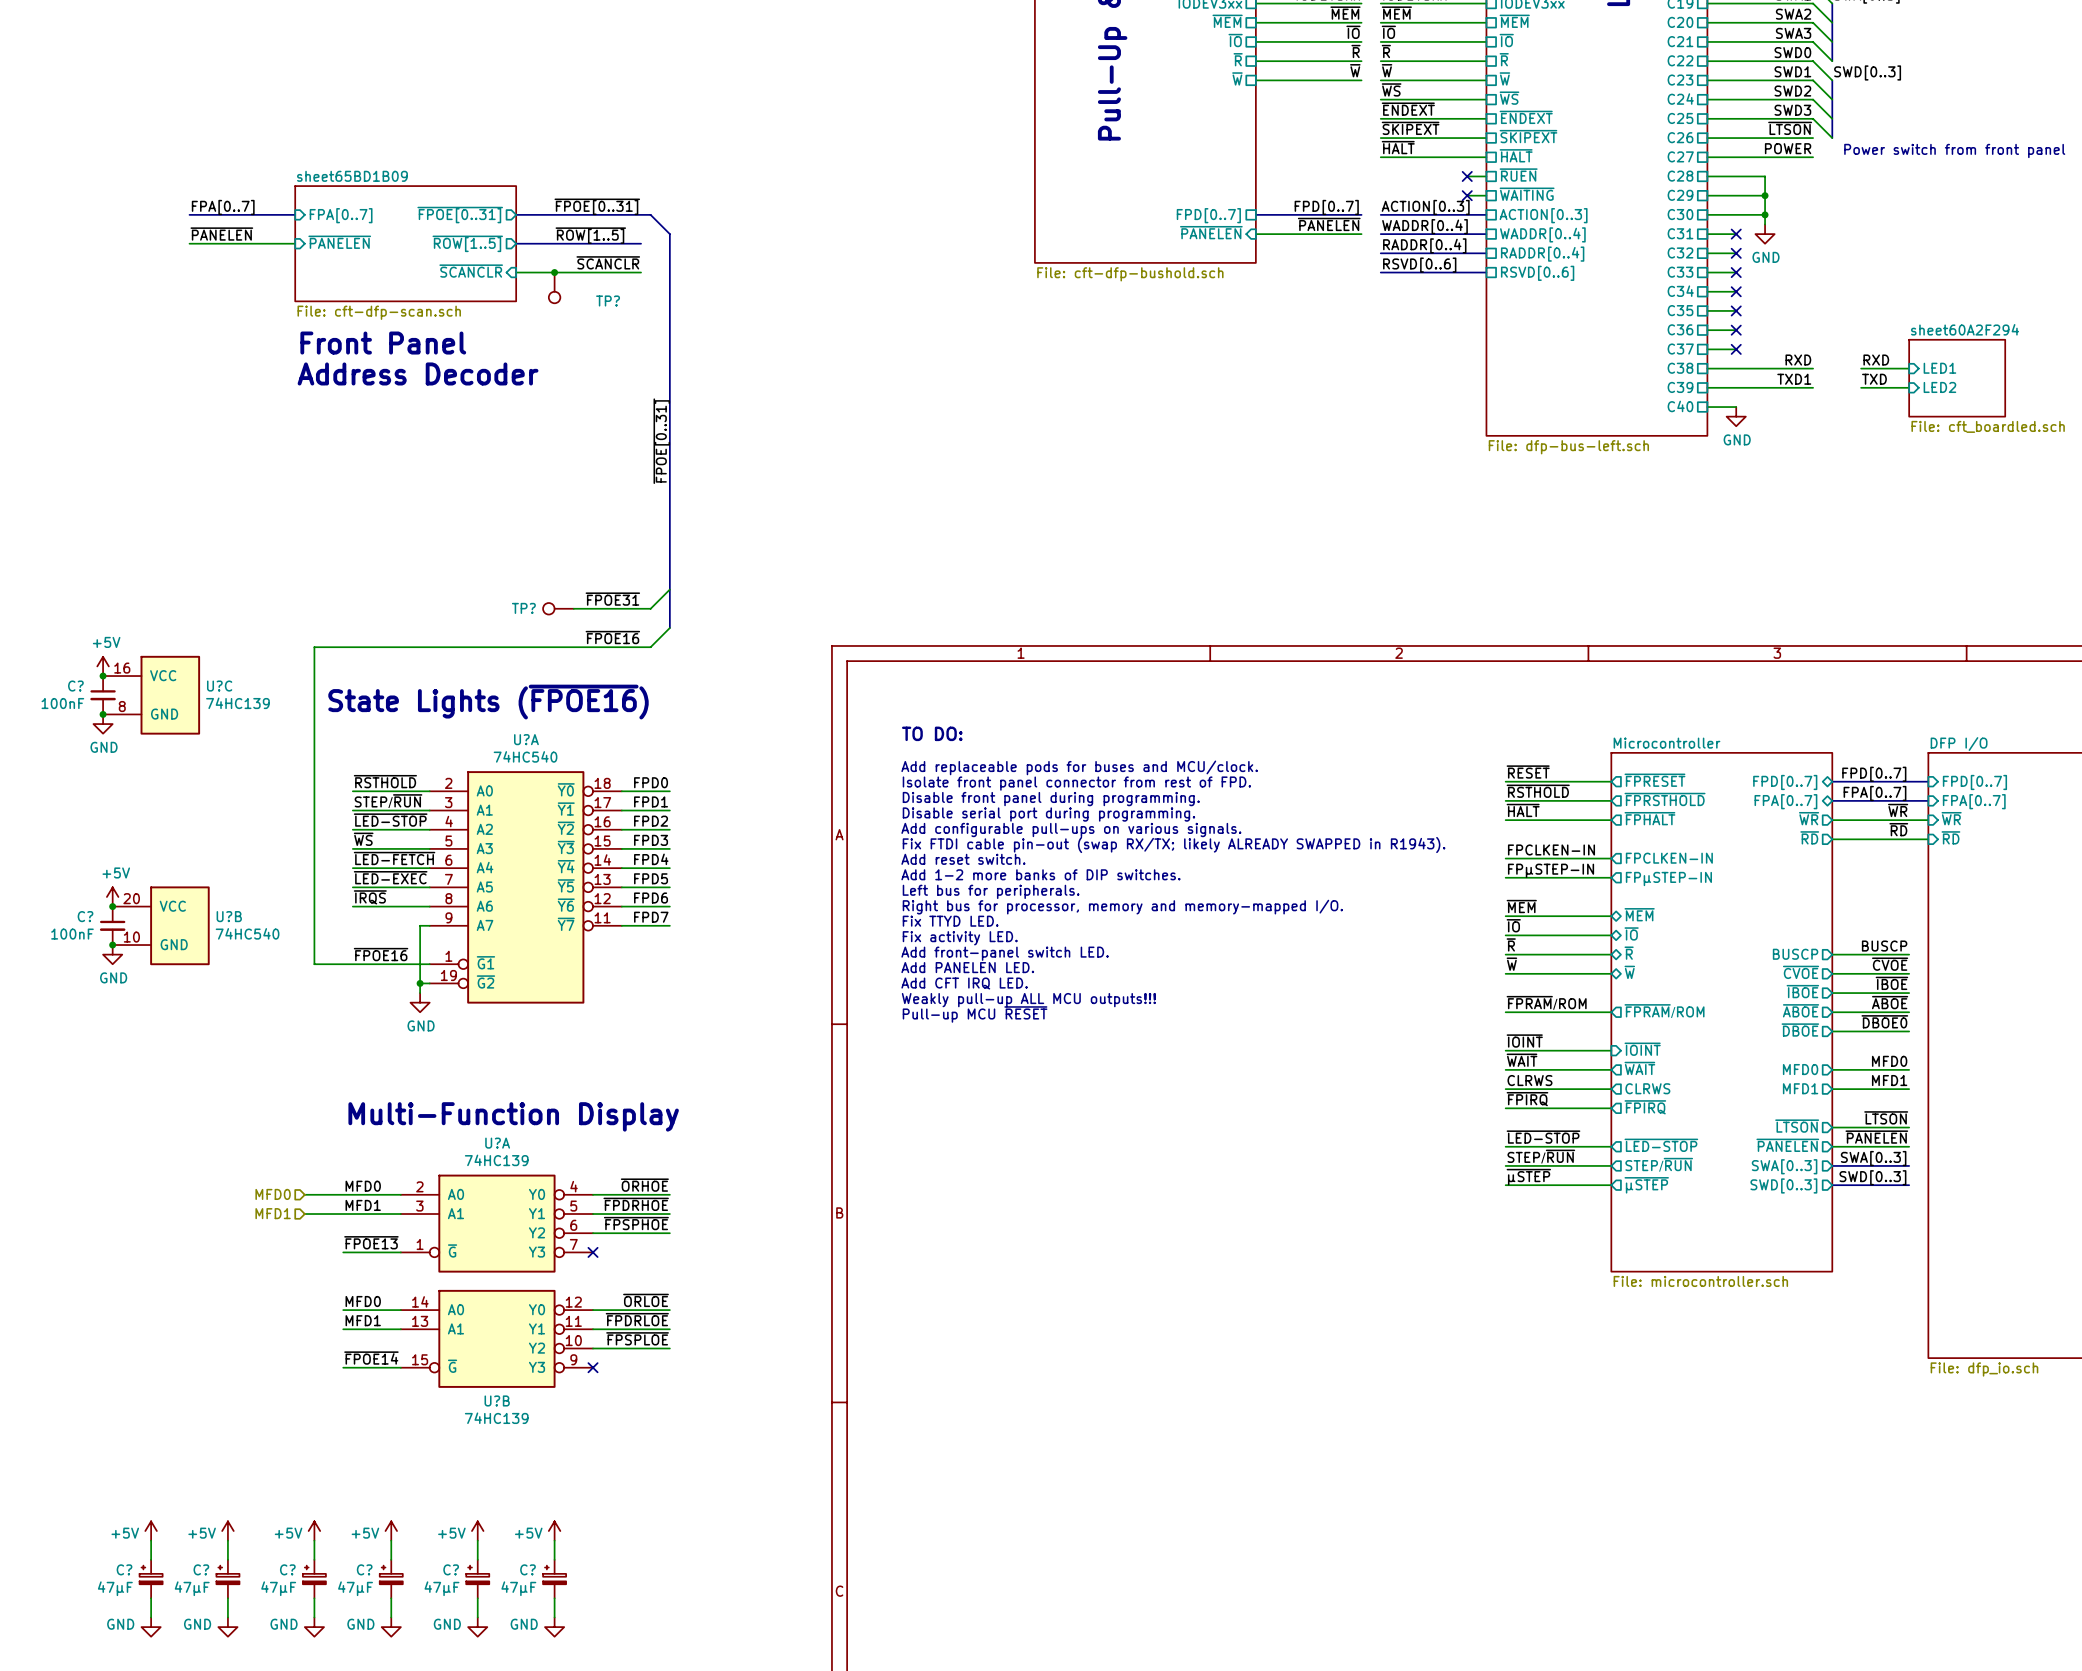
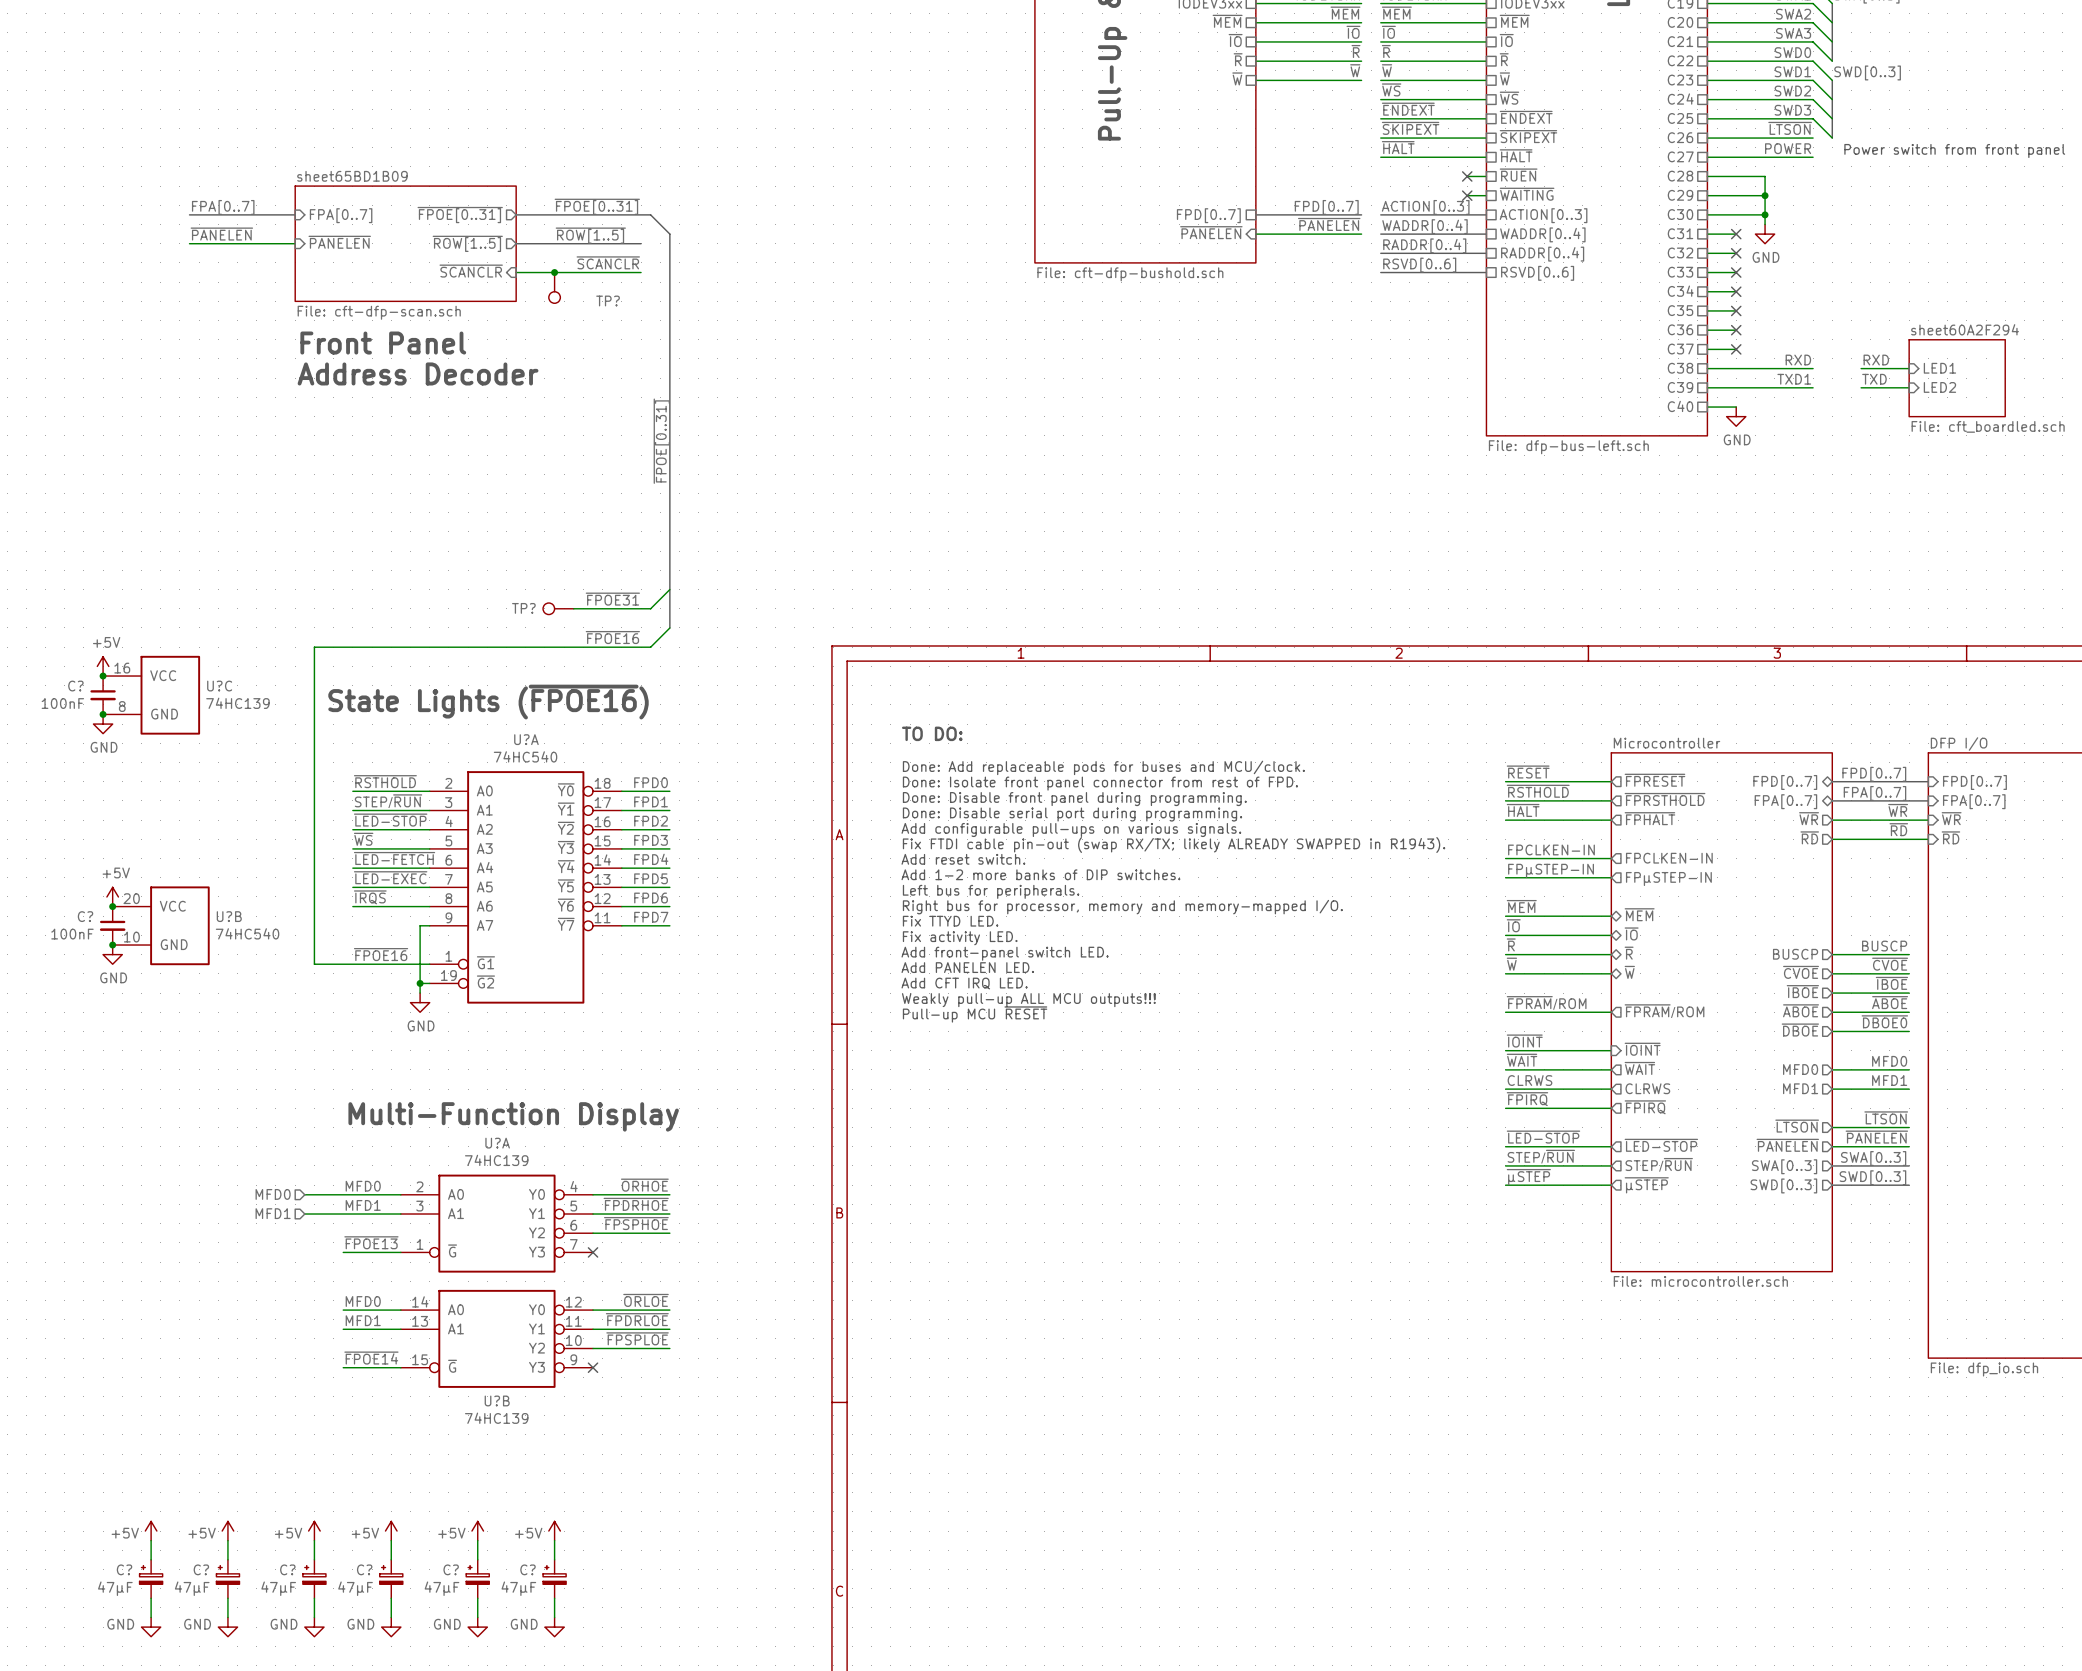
text: Add replaceable pods for buses and MCU/clock. (1079, 767) -> Done: Add replaceable pods for buses and MCU/clock. (1103, 767)
text: Isolate front panel connector from rest of FPD. (1076, 783) -> Done: Isolate front panel connector from rest of FPD. (1100, 783)
text: Disable front panel during programming. (1051, 799) -> Done: Disable front panel during programming. (1074, 799)
text: Disable serial port during programming. (1048, 814) -> Done: Disable serial port during programming. (1072, 814)

